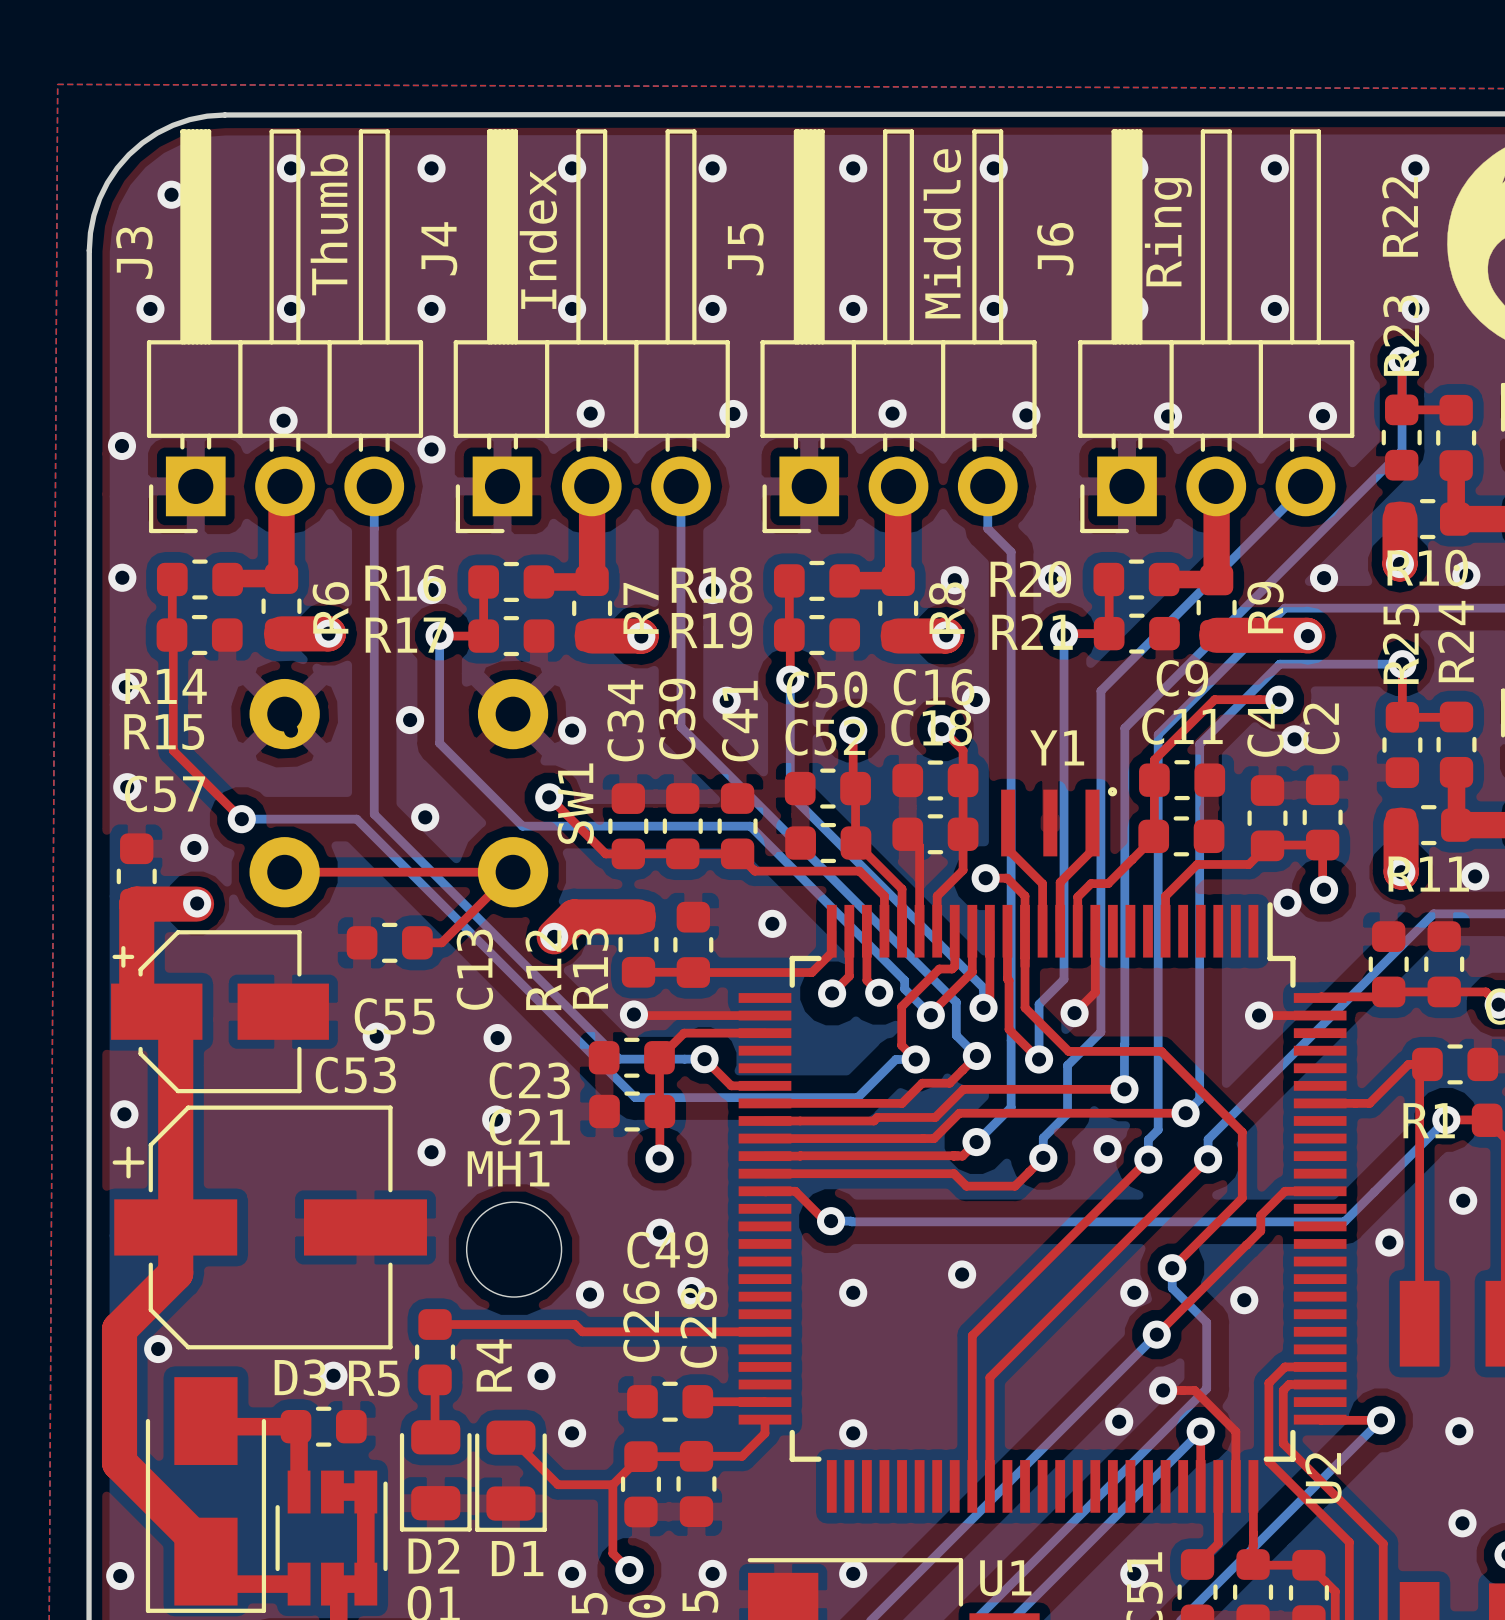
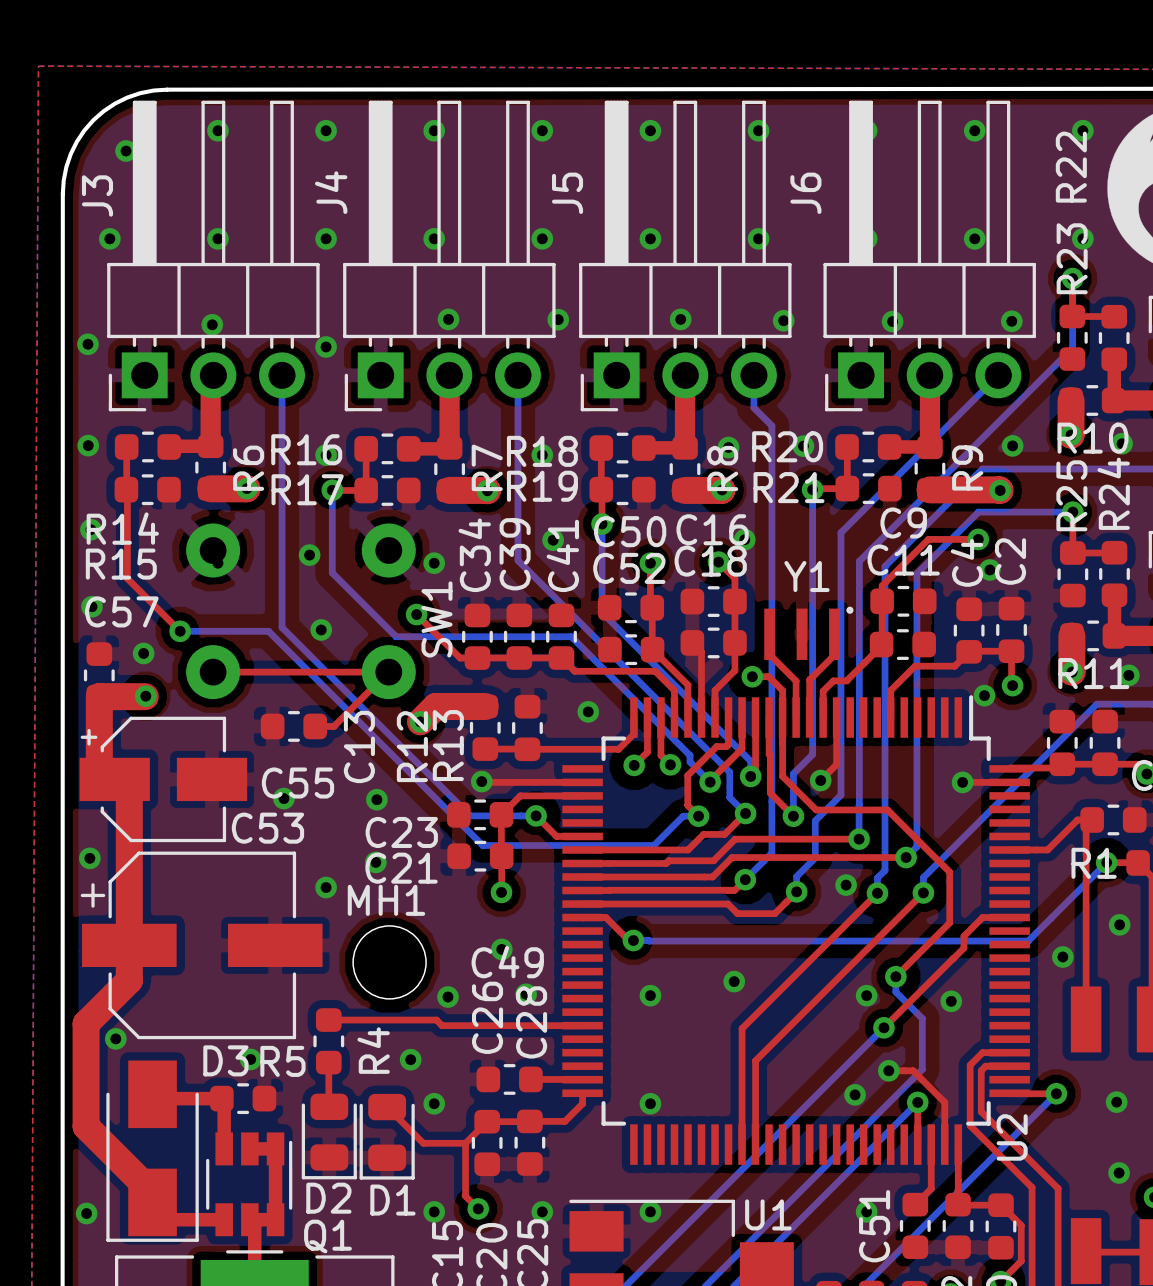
J3 value: Thumb (329, 224) -> none
J6 value: Ring (1168, 232) -> none
J5 value: Middle (942, 233) -> none
J4 value: Index (538, 239) -> none

